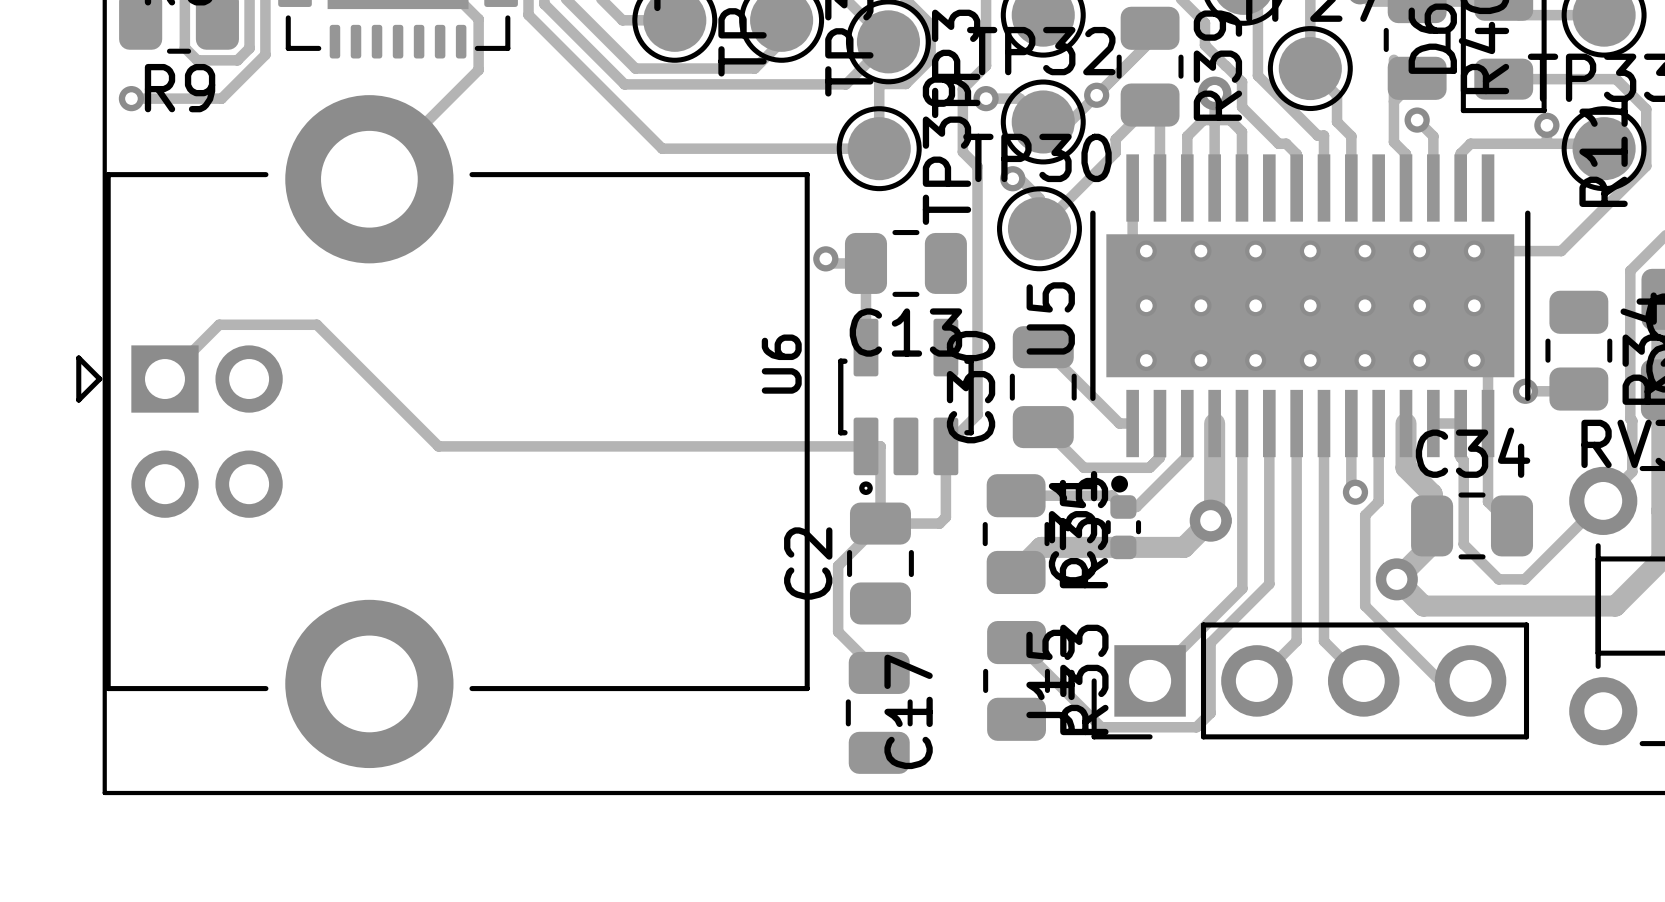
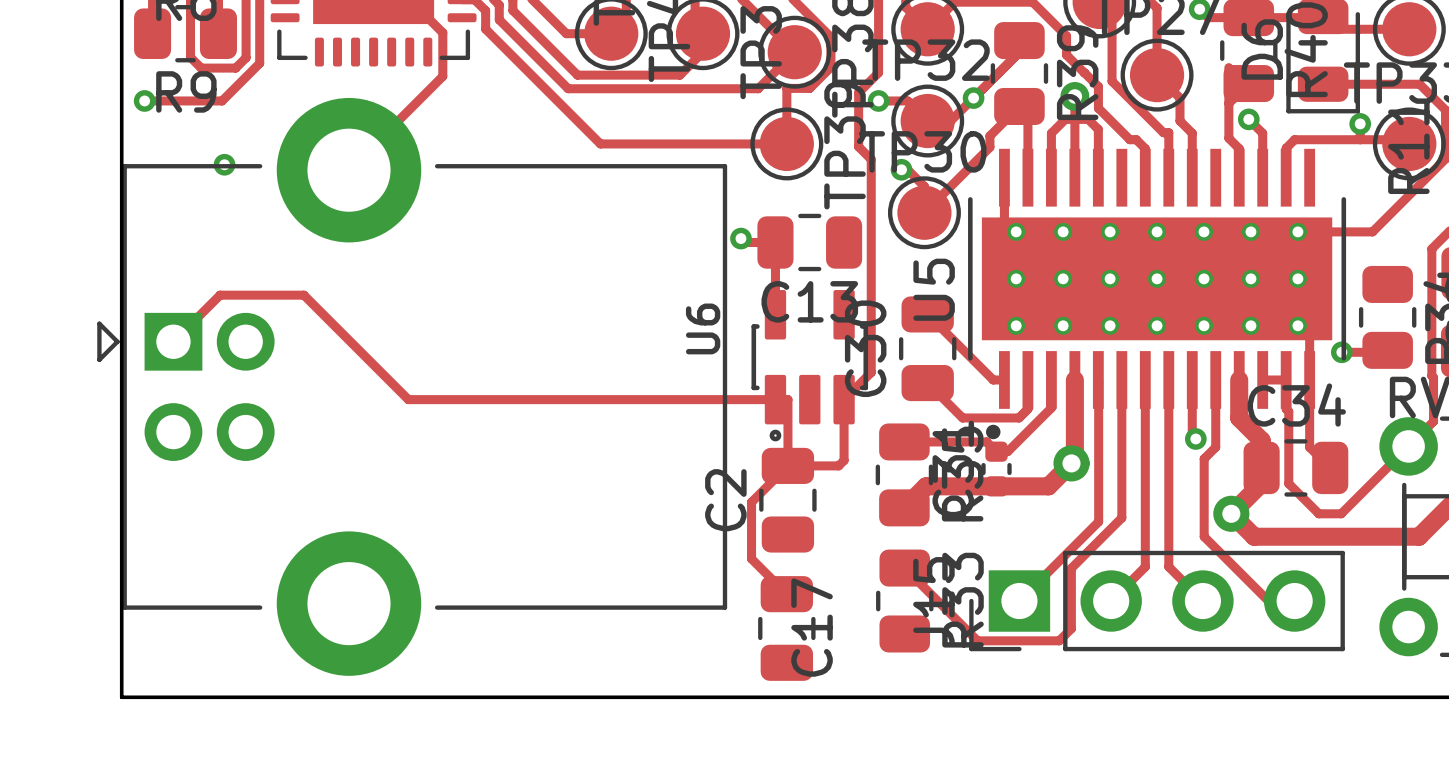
via: none -> (224, 164)

